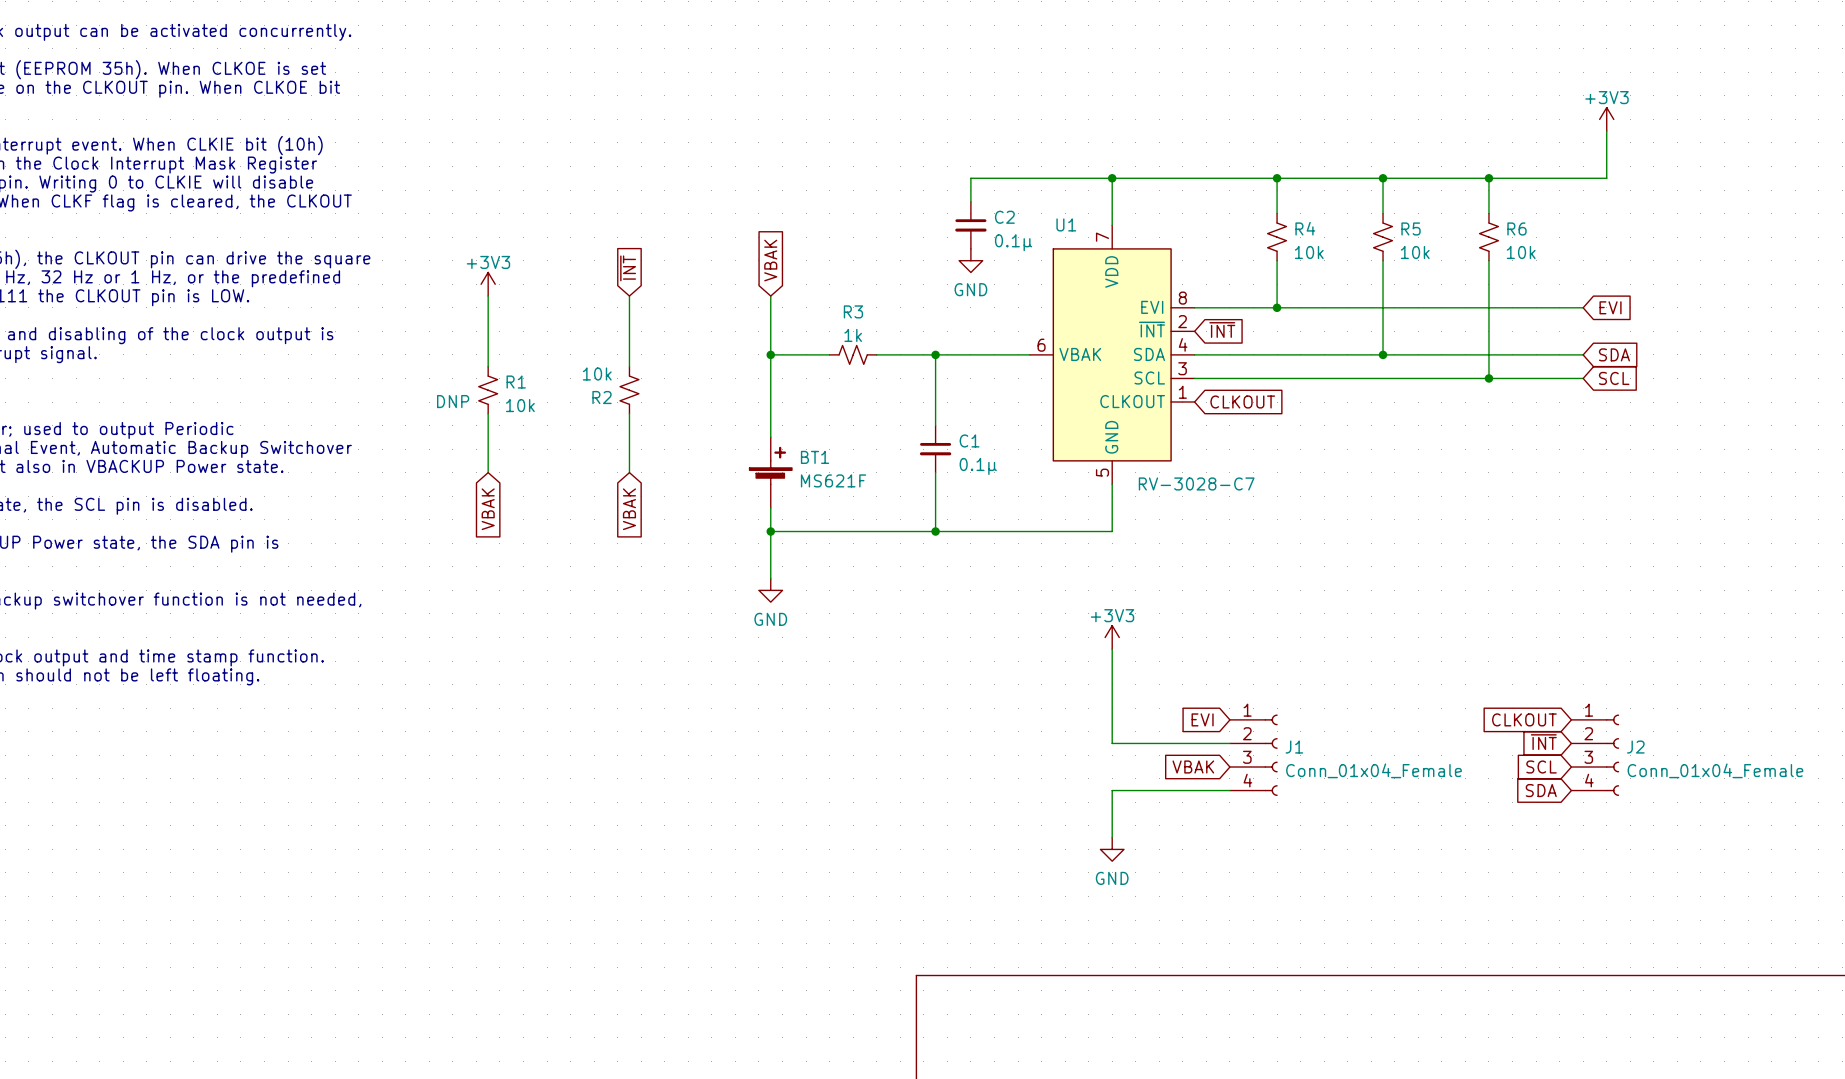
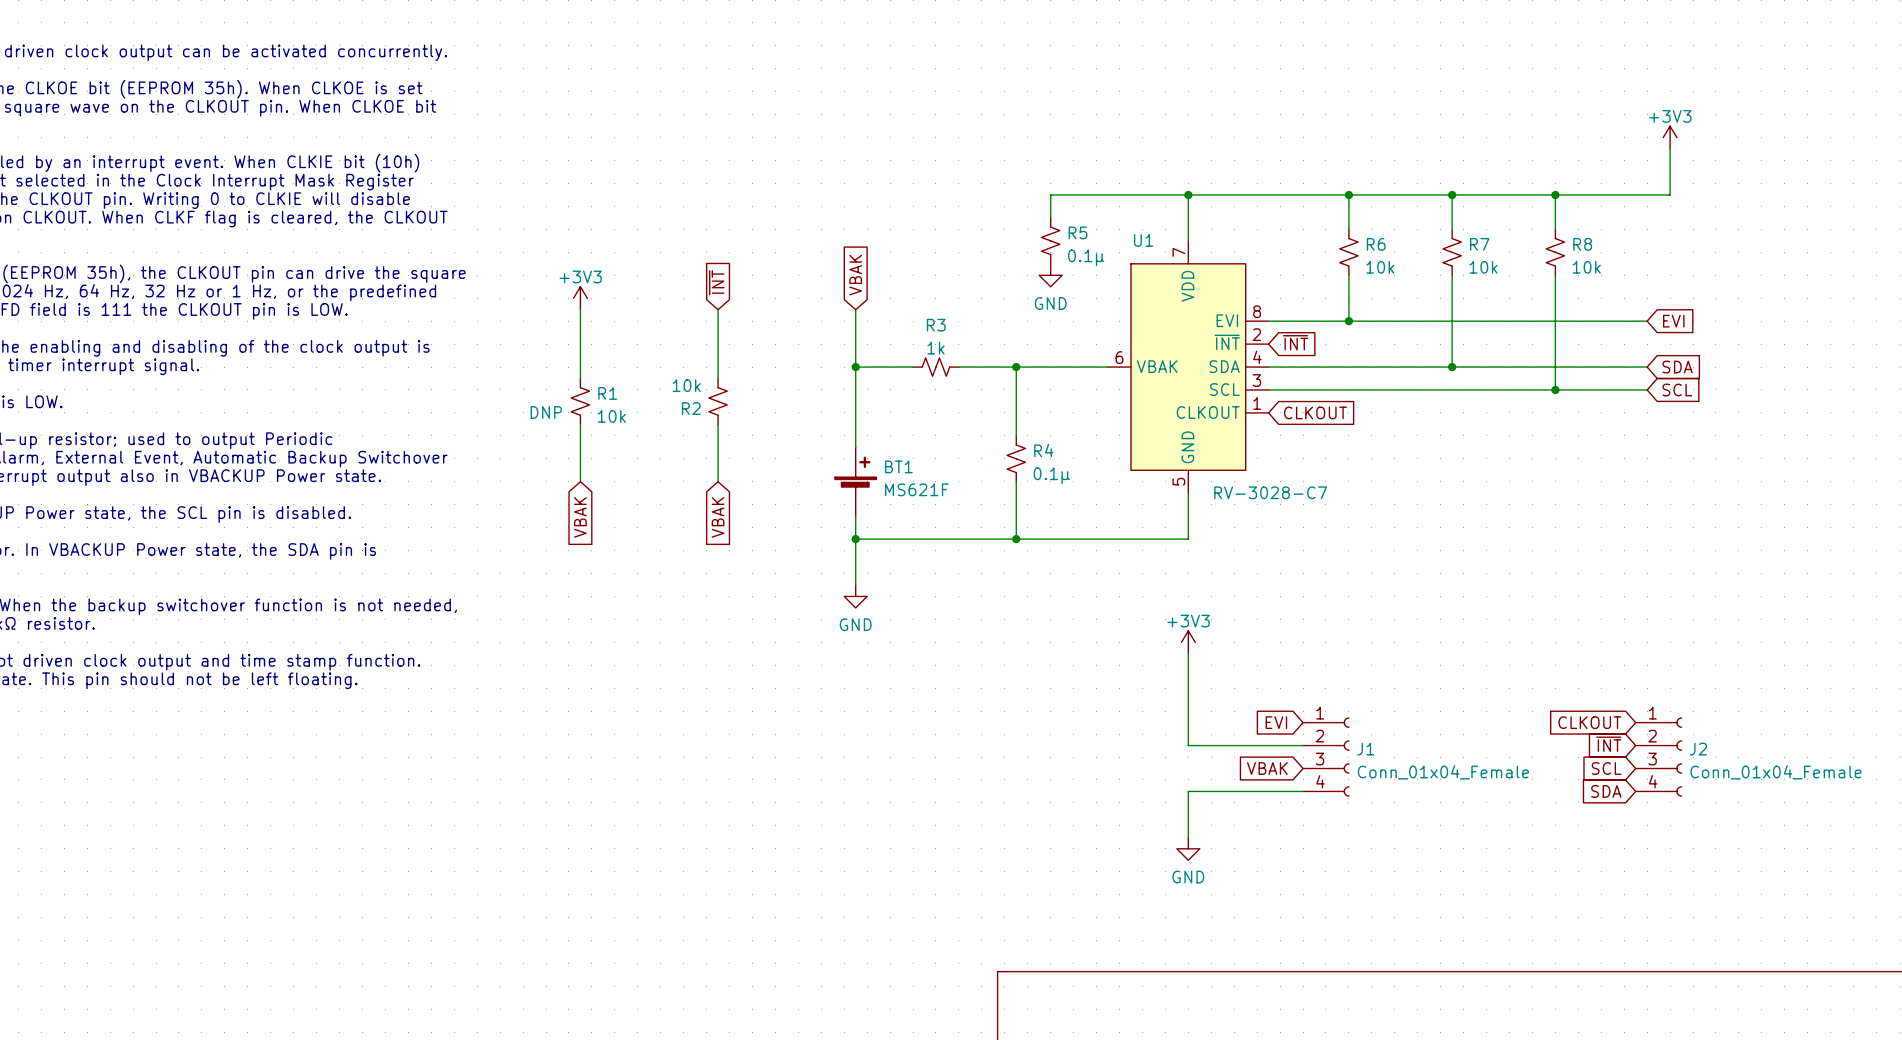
C2: 0.1µ (970, 225) -> none
R5: none -> 0.1µ (1050, 240)
R4 name: R4 (1305, 228) -> R6 (1376, 244)
R5 name: R5 (1411, 228) -> R7 (1479, 244)
R6 name: R6 (1516, 228) -> R8 (1582, 244)
C1: 0.1µ (935, 449) -> none
R4: none -> 0.1µ (1016, 458)

